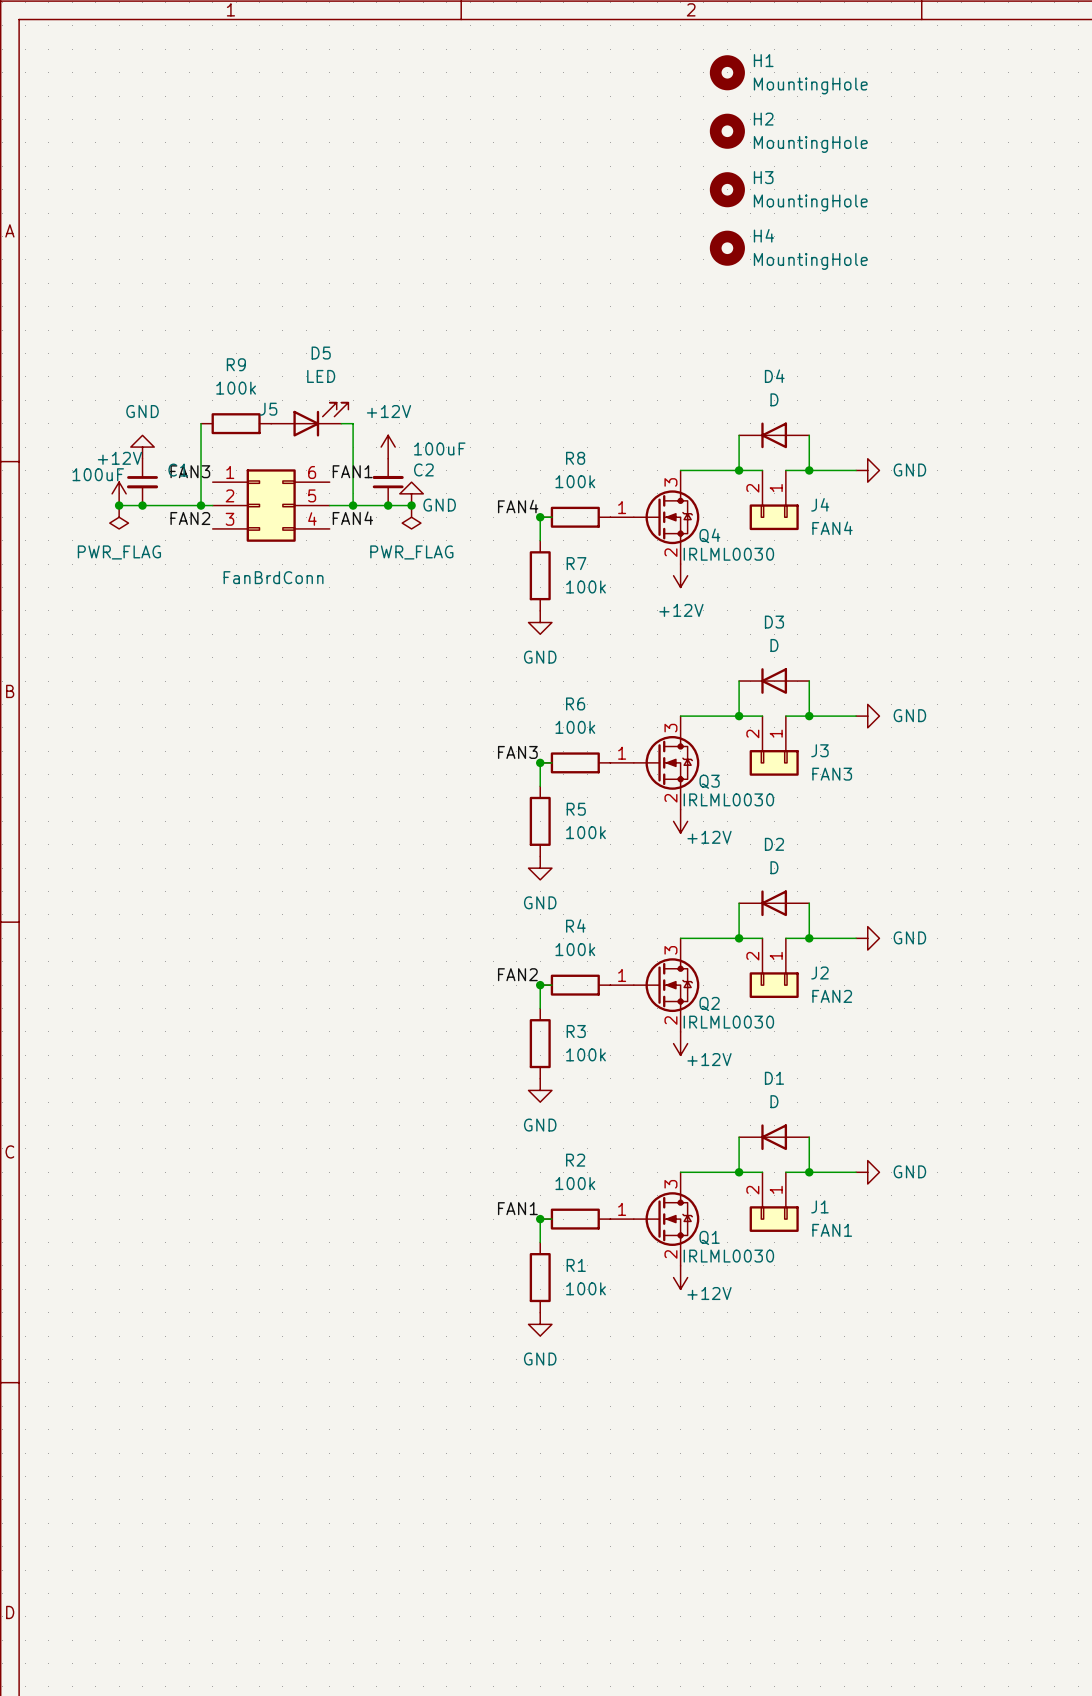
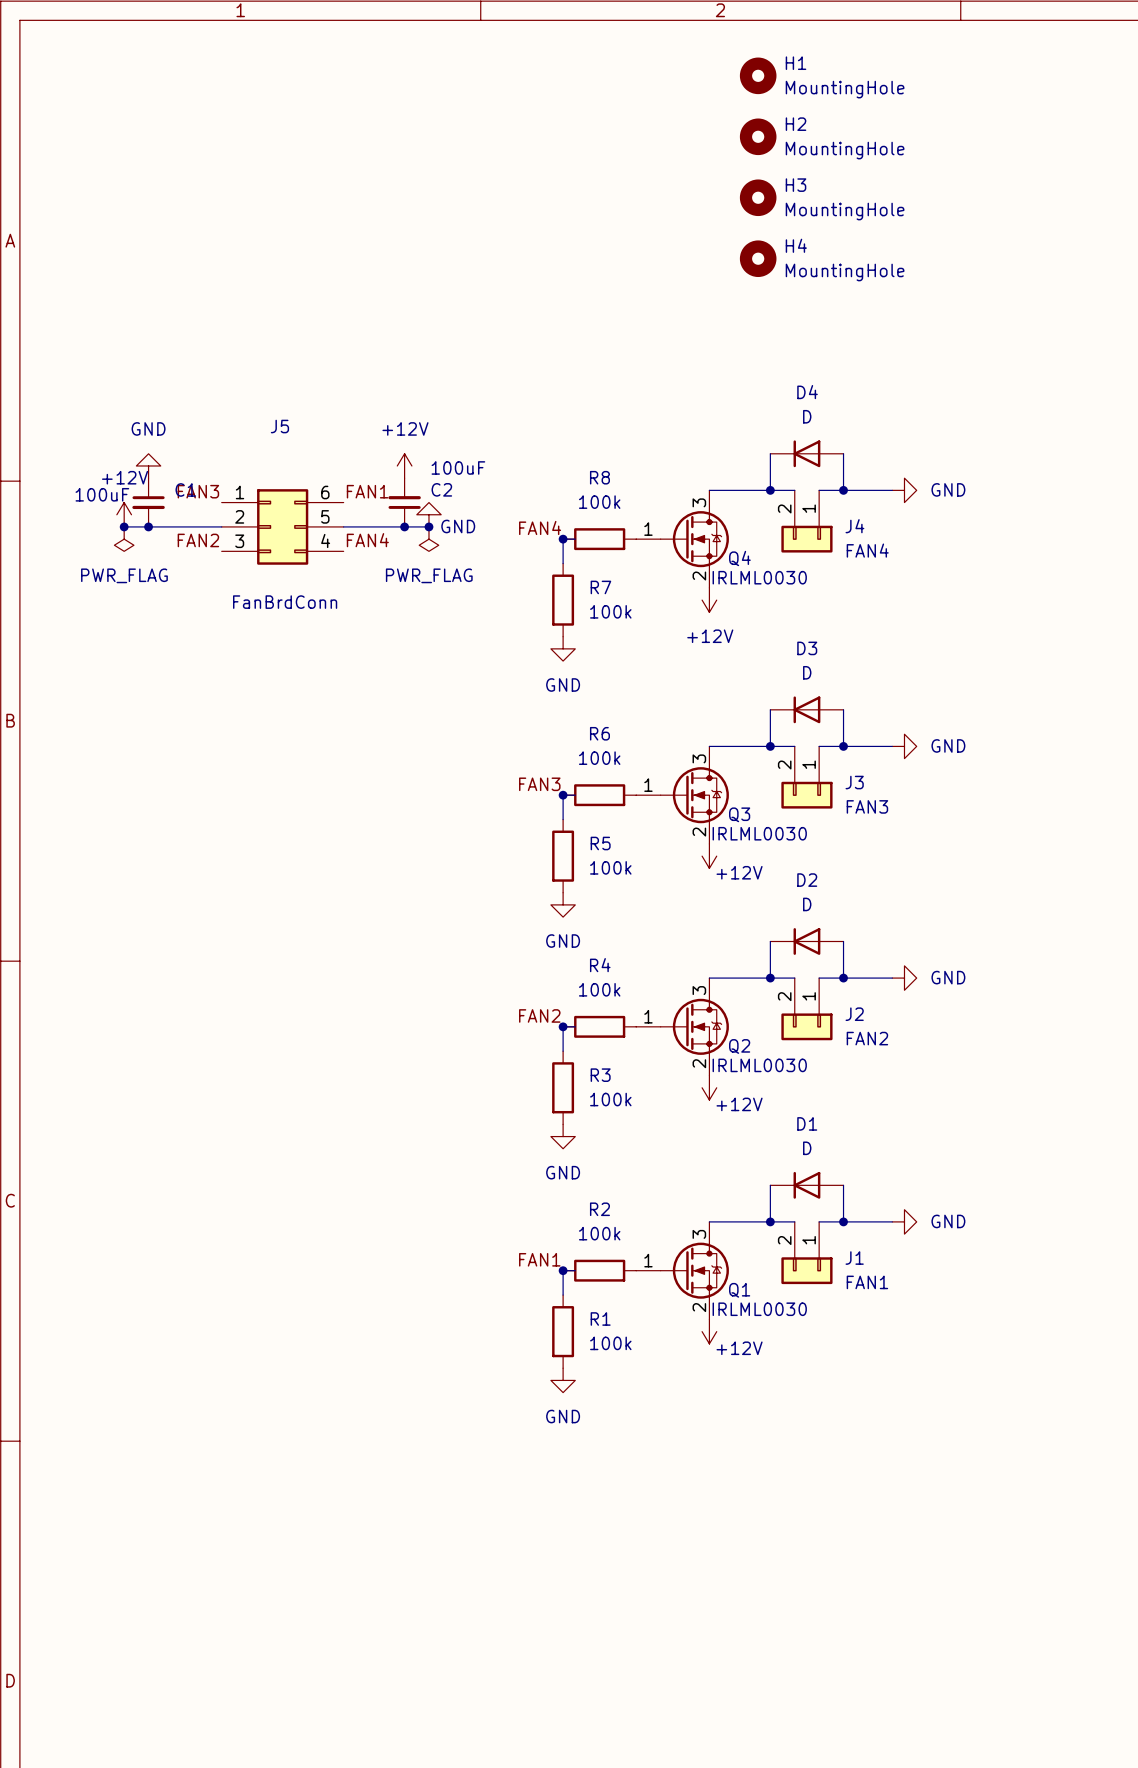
D5: LED (309, 419) -> none
wire: (201, 423) (201, 505) -> none
R9: 100k (236, 423) -> none
wire: (341, 423) (353, 423) (353, 505) -> none
junction: (201, 505) -> none
junction: (353, 505) -> none

